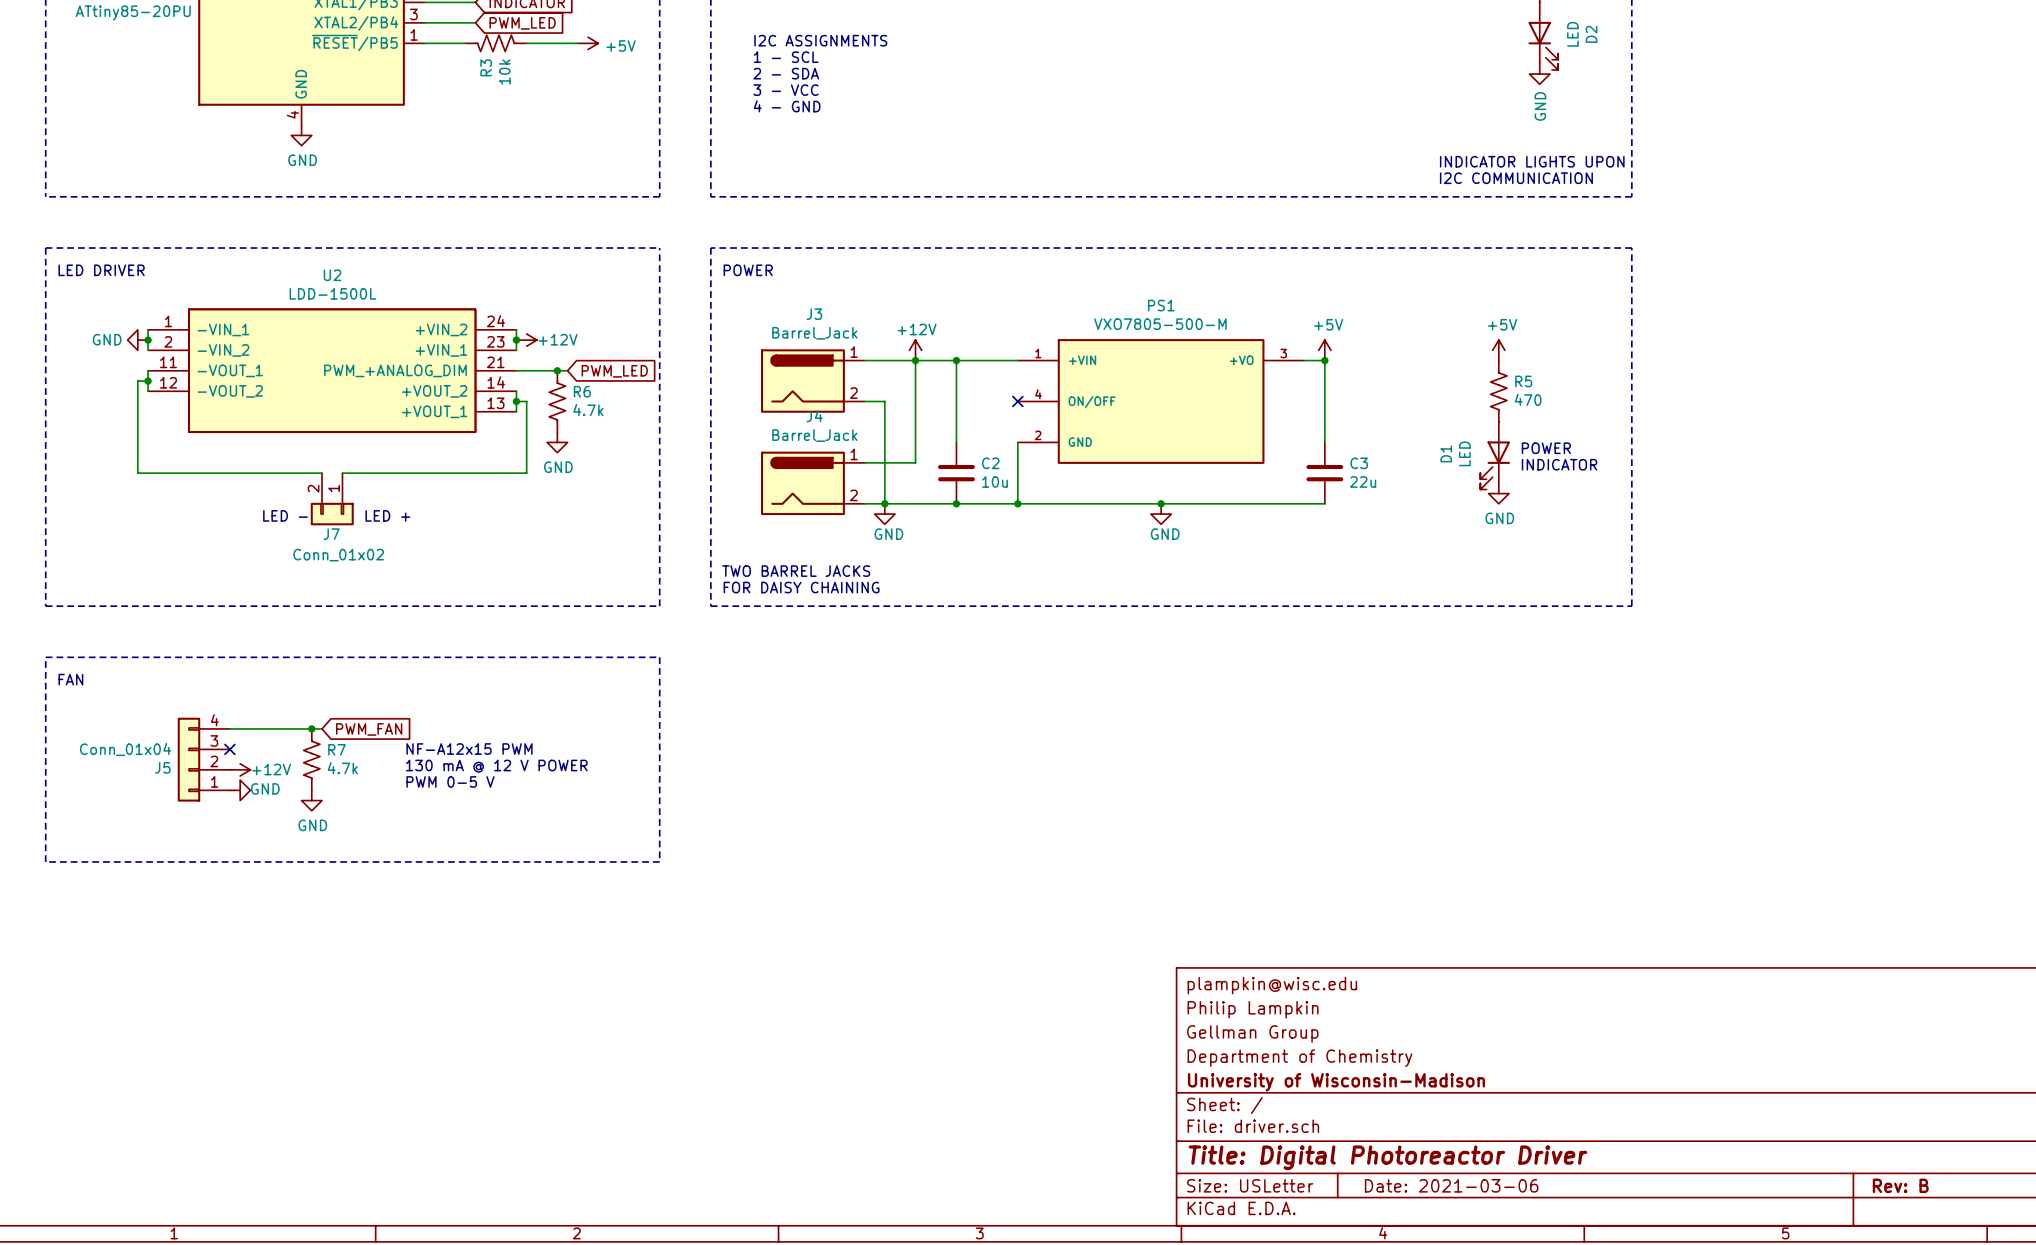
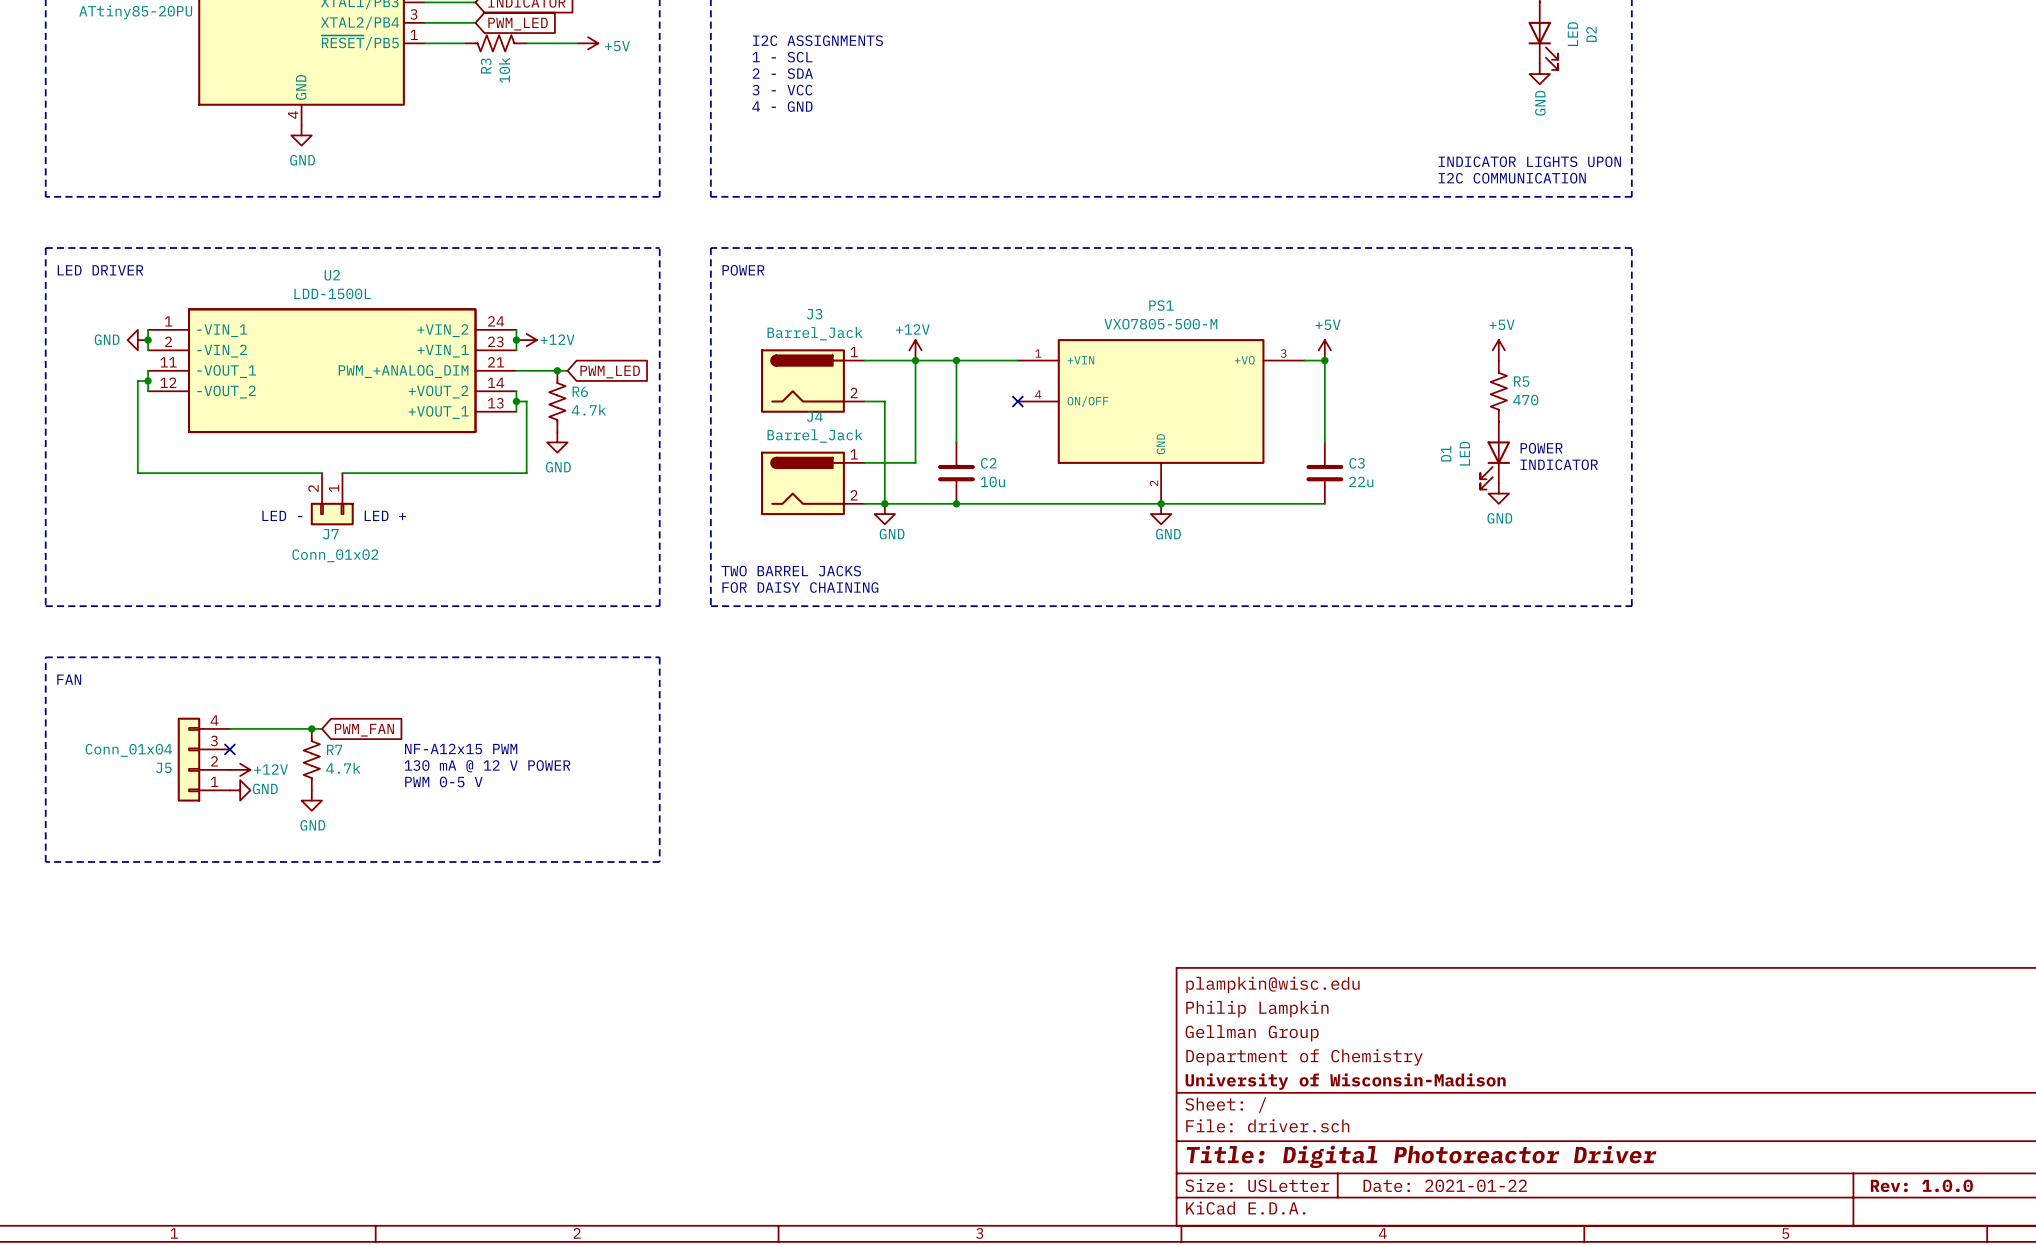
PS1 symbol: [1017, 339, 1305, 464] -> [1017, 339, 1305, 504]
wire: (1017, 442) (1017, 503) -> none
junction: (1017, 503) -> none
title block: Date: 2021-03-06 (1451, 1185) -> Date: 2021-01-22 (1445, 1185)
title block: Rev: B (1900, 1185) -> Rev: 1.0.0 (1921, 1185)

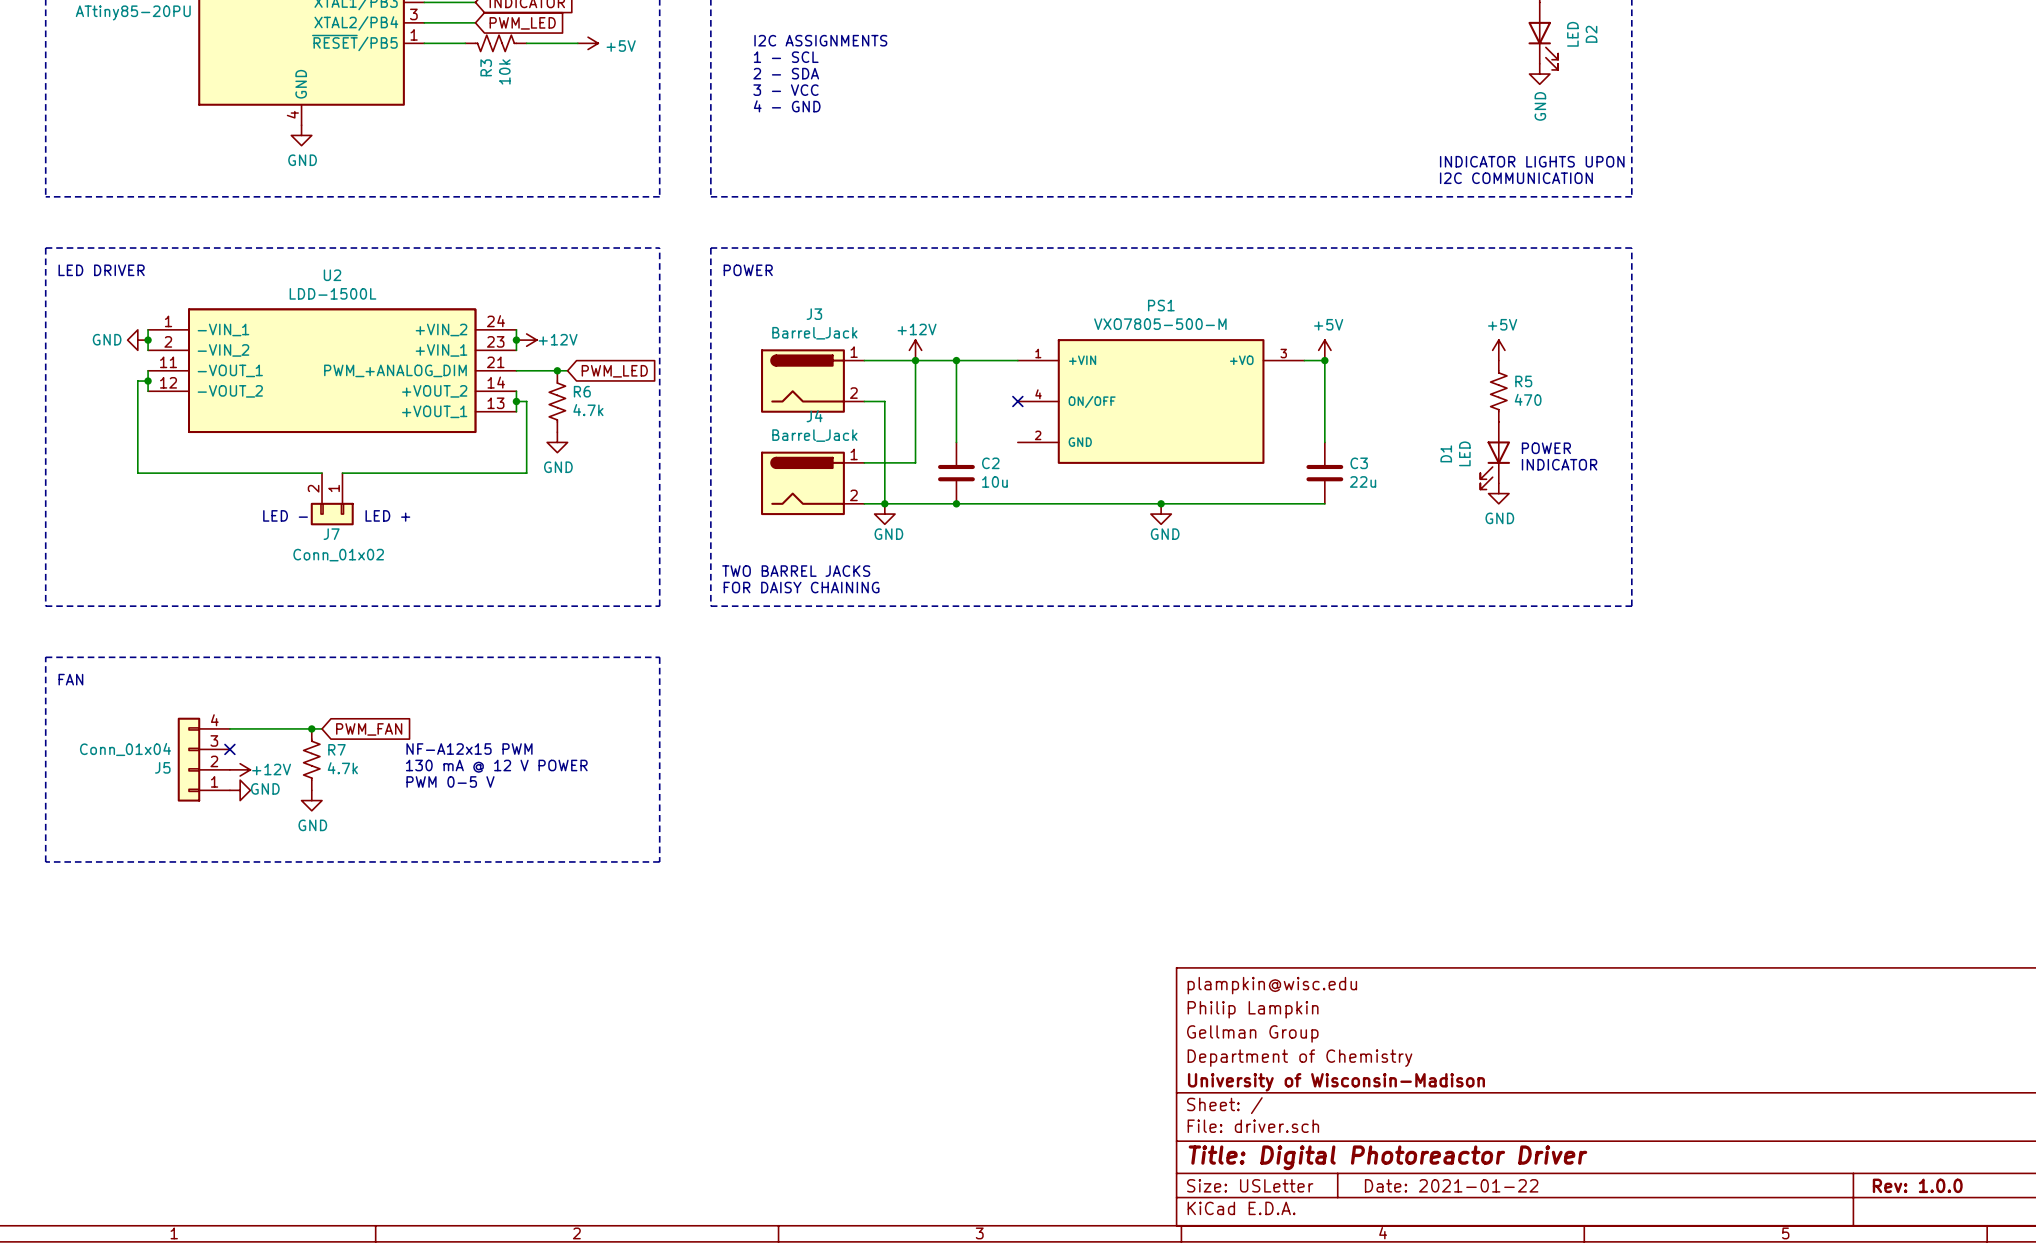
PS1 symbol: [1017, 339, 1305, 504] -> [1017, 339, 1305, 464]

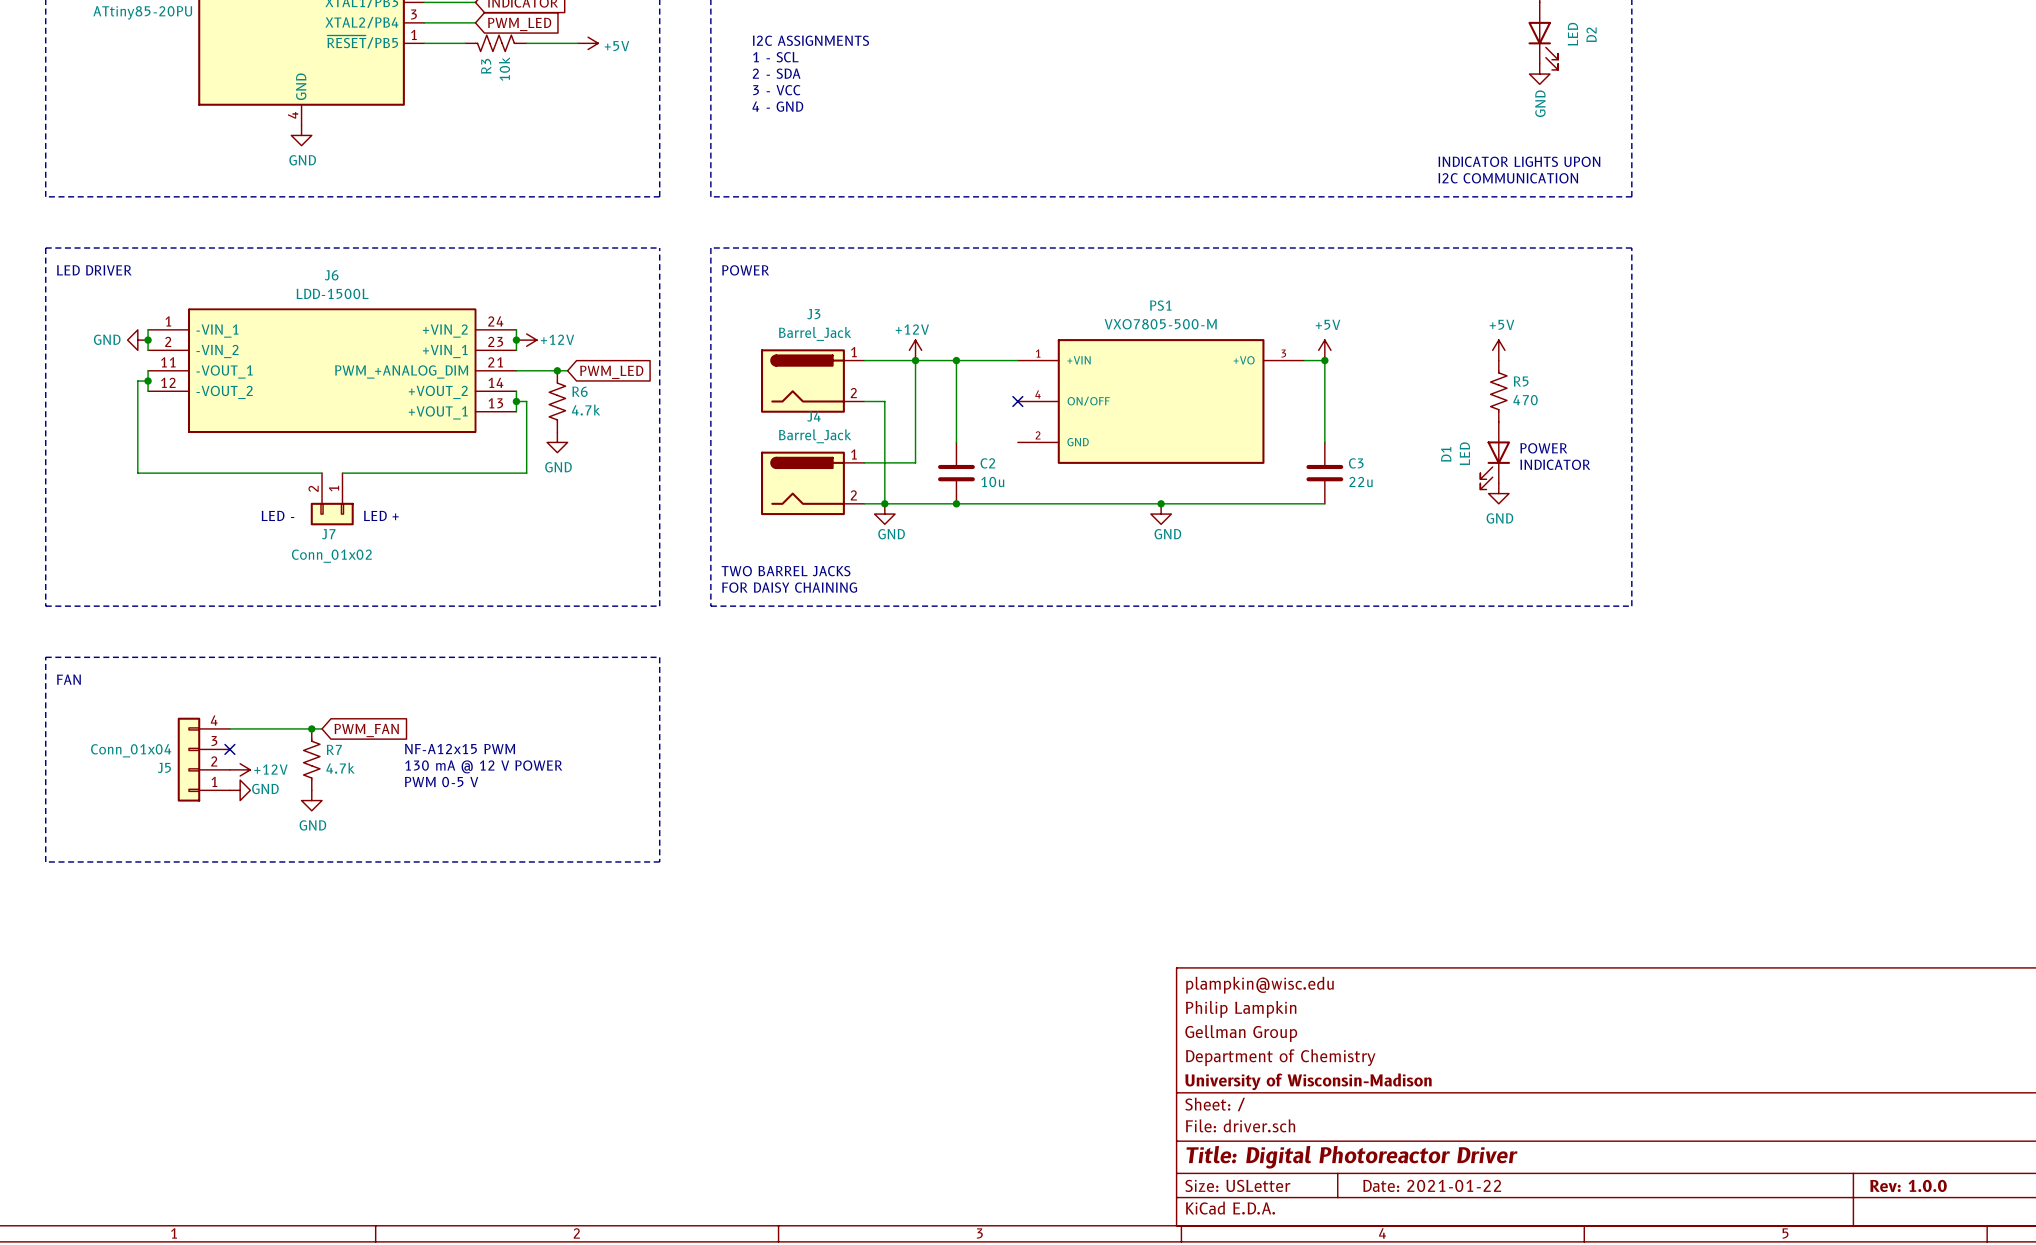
U2 name: U2 (332, 275) -> J6 (331, 275)

